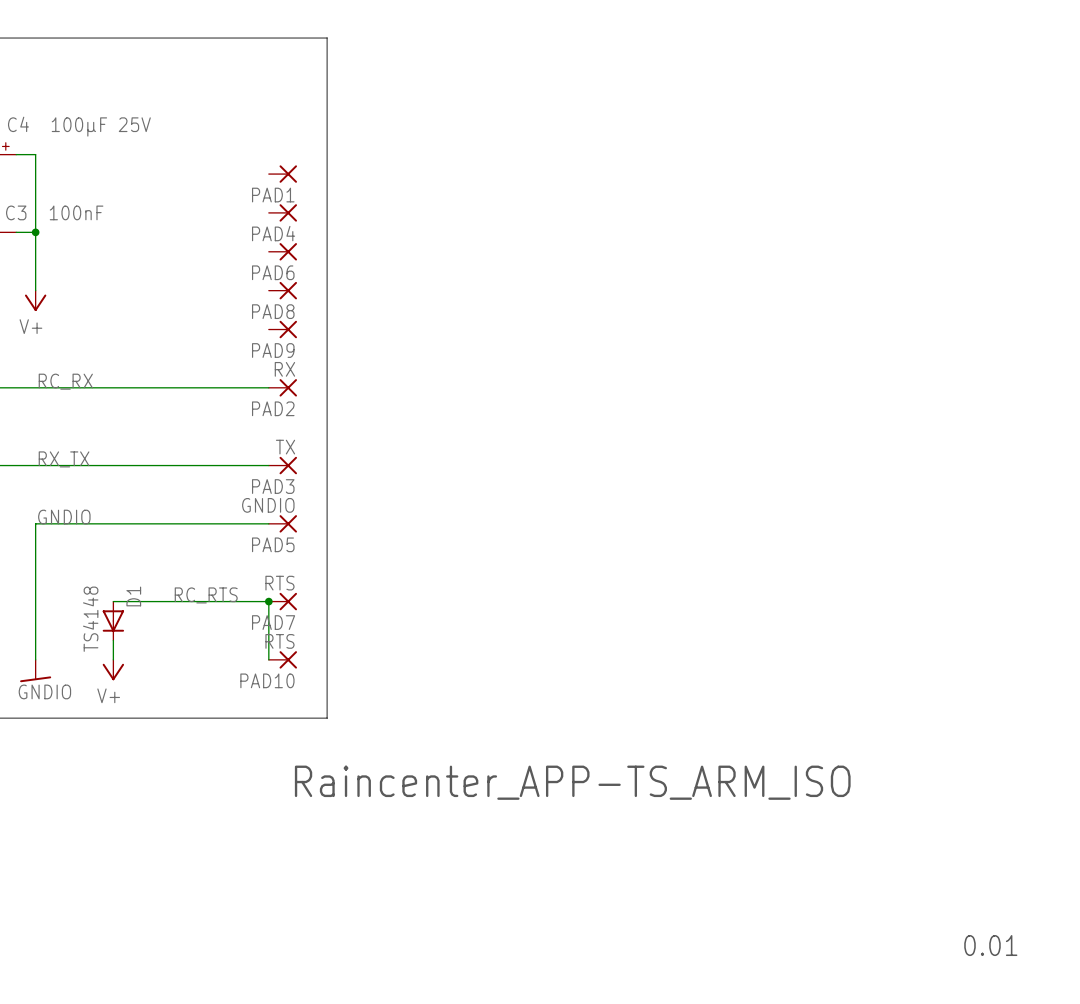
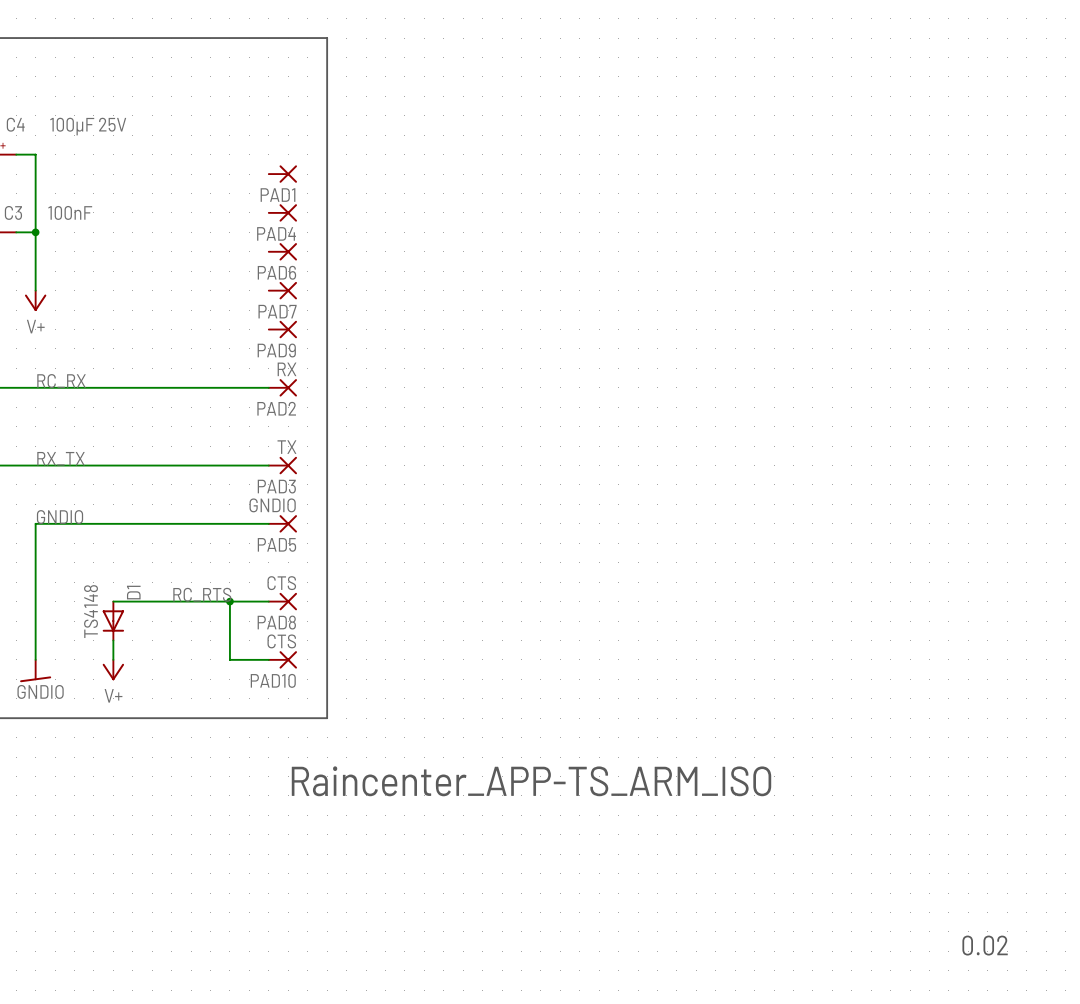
PAD8 name: PAD8 (273, 311) -> PAD7 (277, 311)
PAD7 value: RTS (279, 583) -> CTS (281, 583)
wire: (268, 601) (268, 659) -> (229, 601) (229, 659) (268, 659)
junction position: (268, 601) -> (229, 601)
PAD7 name: PAD7 (273, 622) -> PAD8 (276, 622)
PAD10 value: RTS (279, 641) -> CTS (281, 641)
text: 0.01 (990, 945) -> 0.02 (985, 945)

